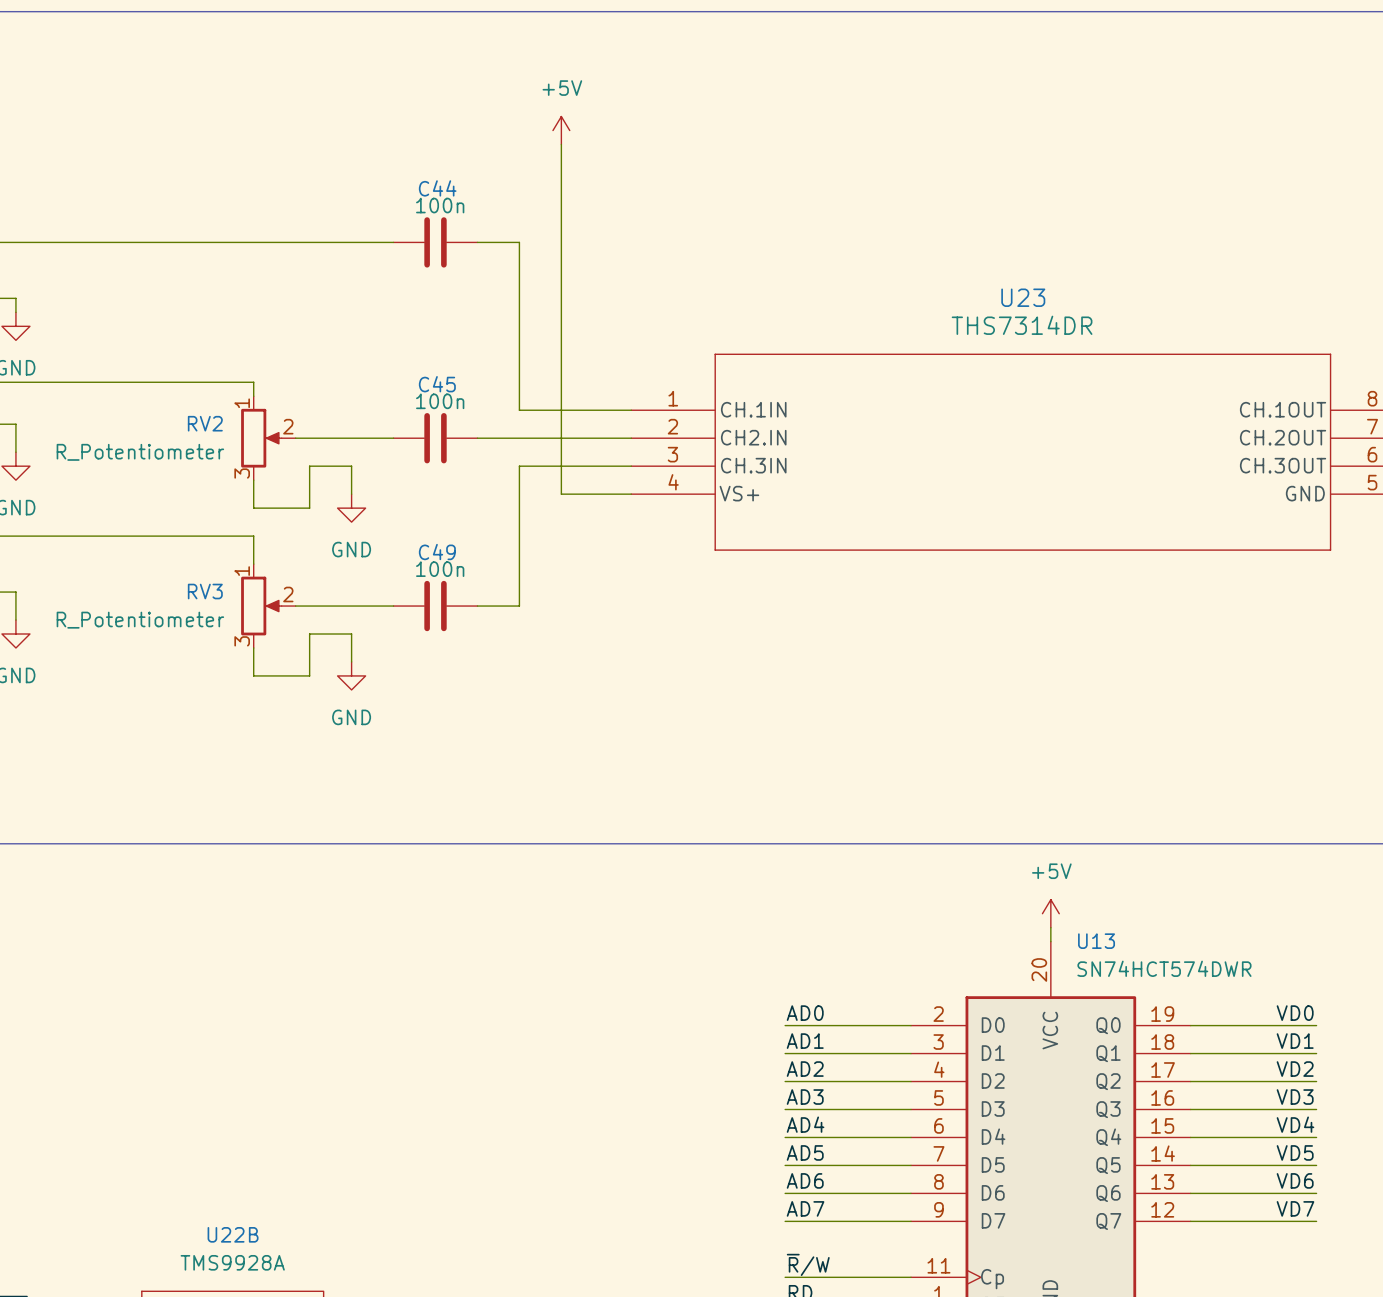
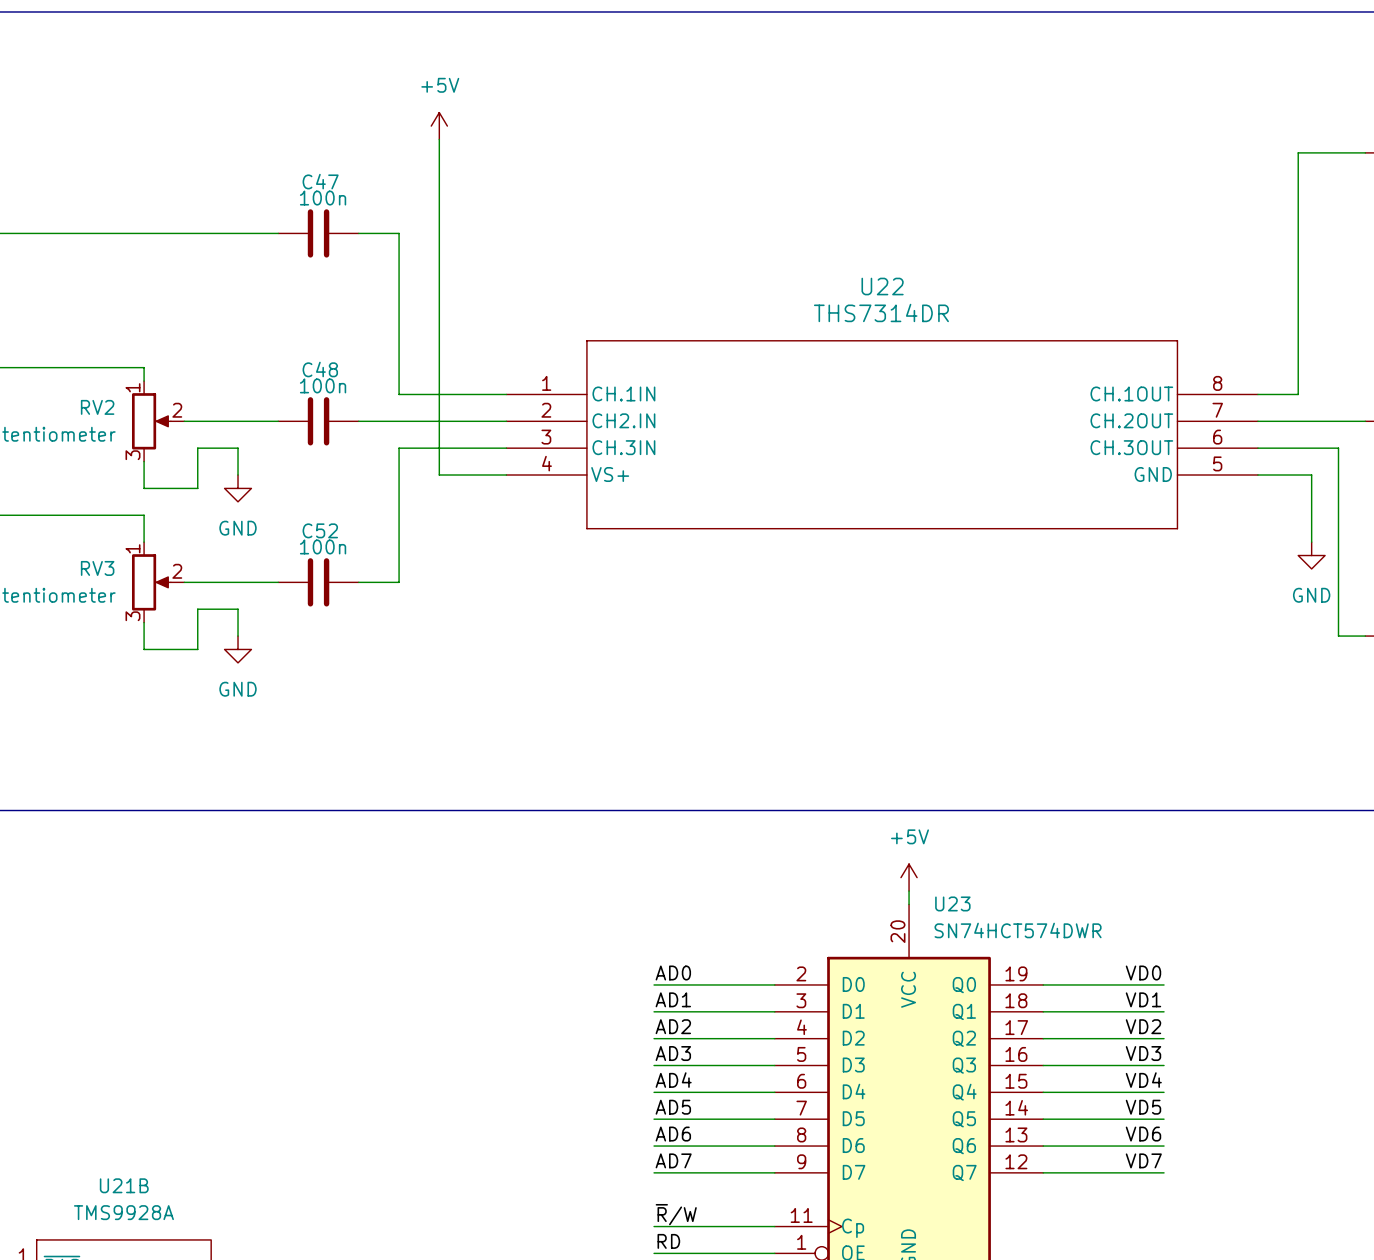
C44 name: C44 (437, 188) -> C47 (320, 181)
U23 name: U23 (1023, 297) -> U22 (882, 286)
C45 name: C45 (437, 384) -> C48 (320, 369)
C49 name: C49 (437, 552) -> C52 (320, 530)
U13 name: U13 (1096, 941) -> U23 (952, 903)
U22B name: U22B (233, 1234) -> U21B (124, 1185)

